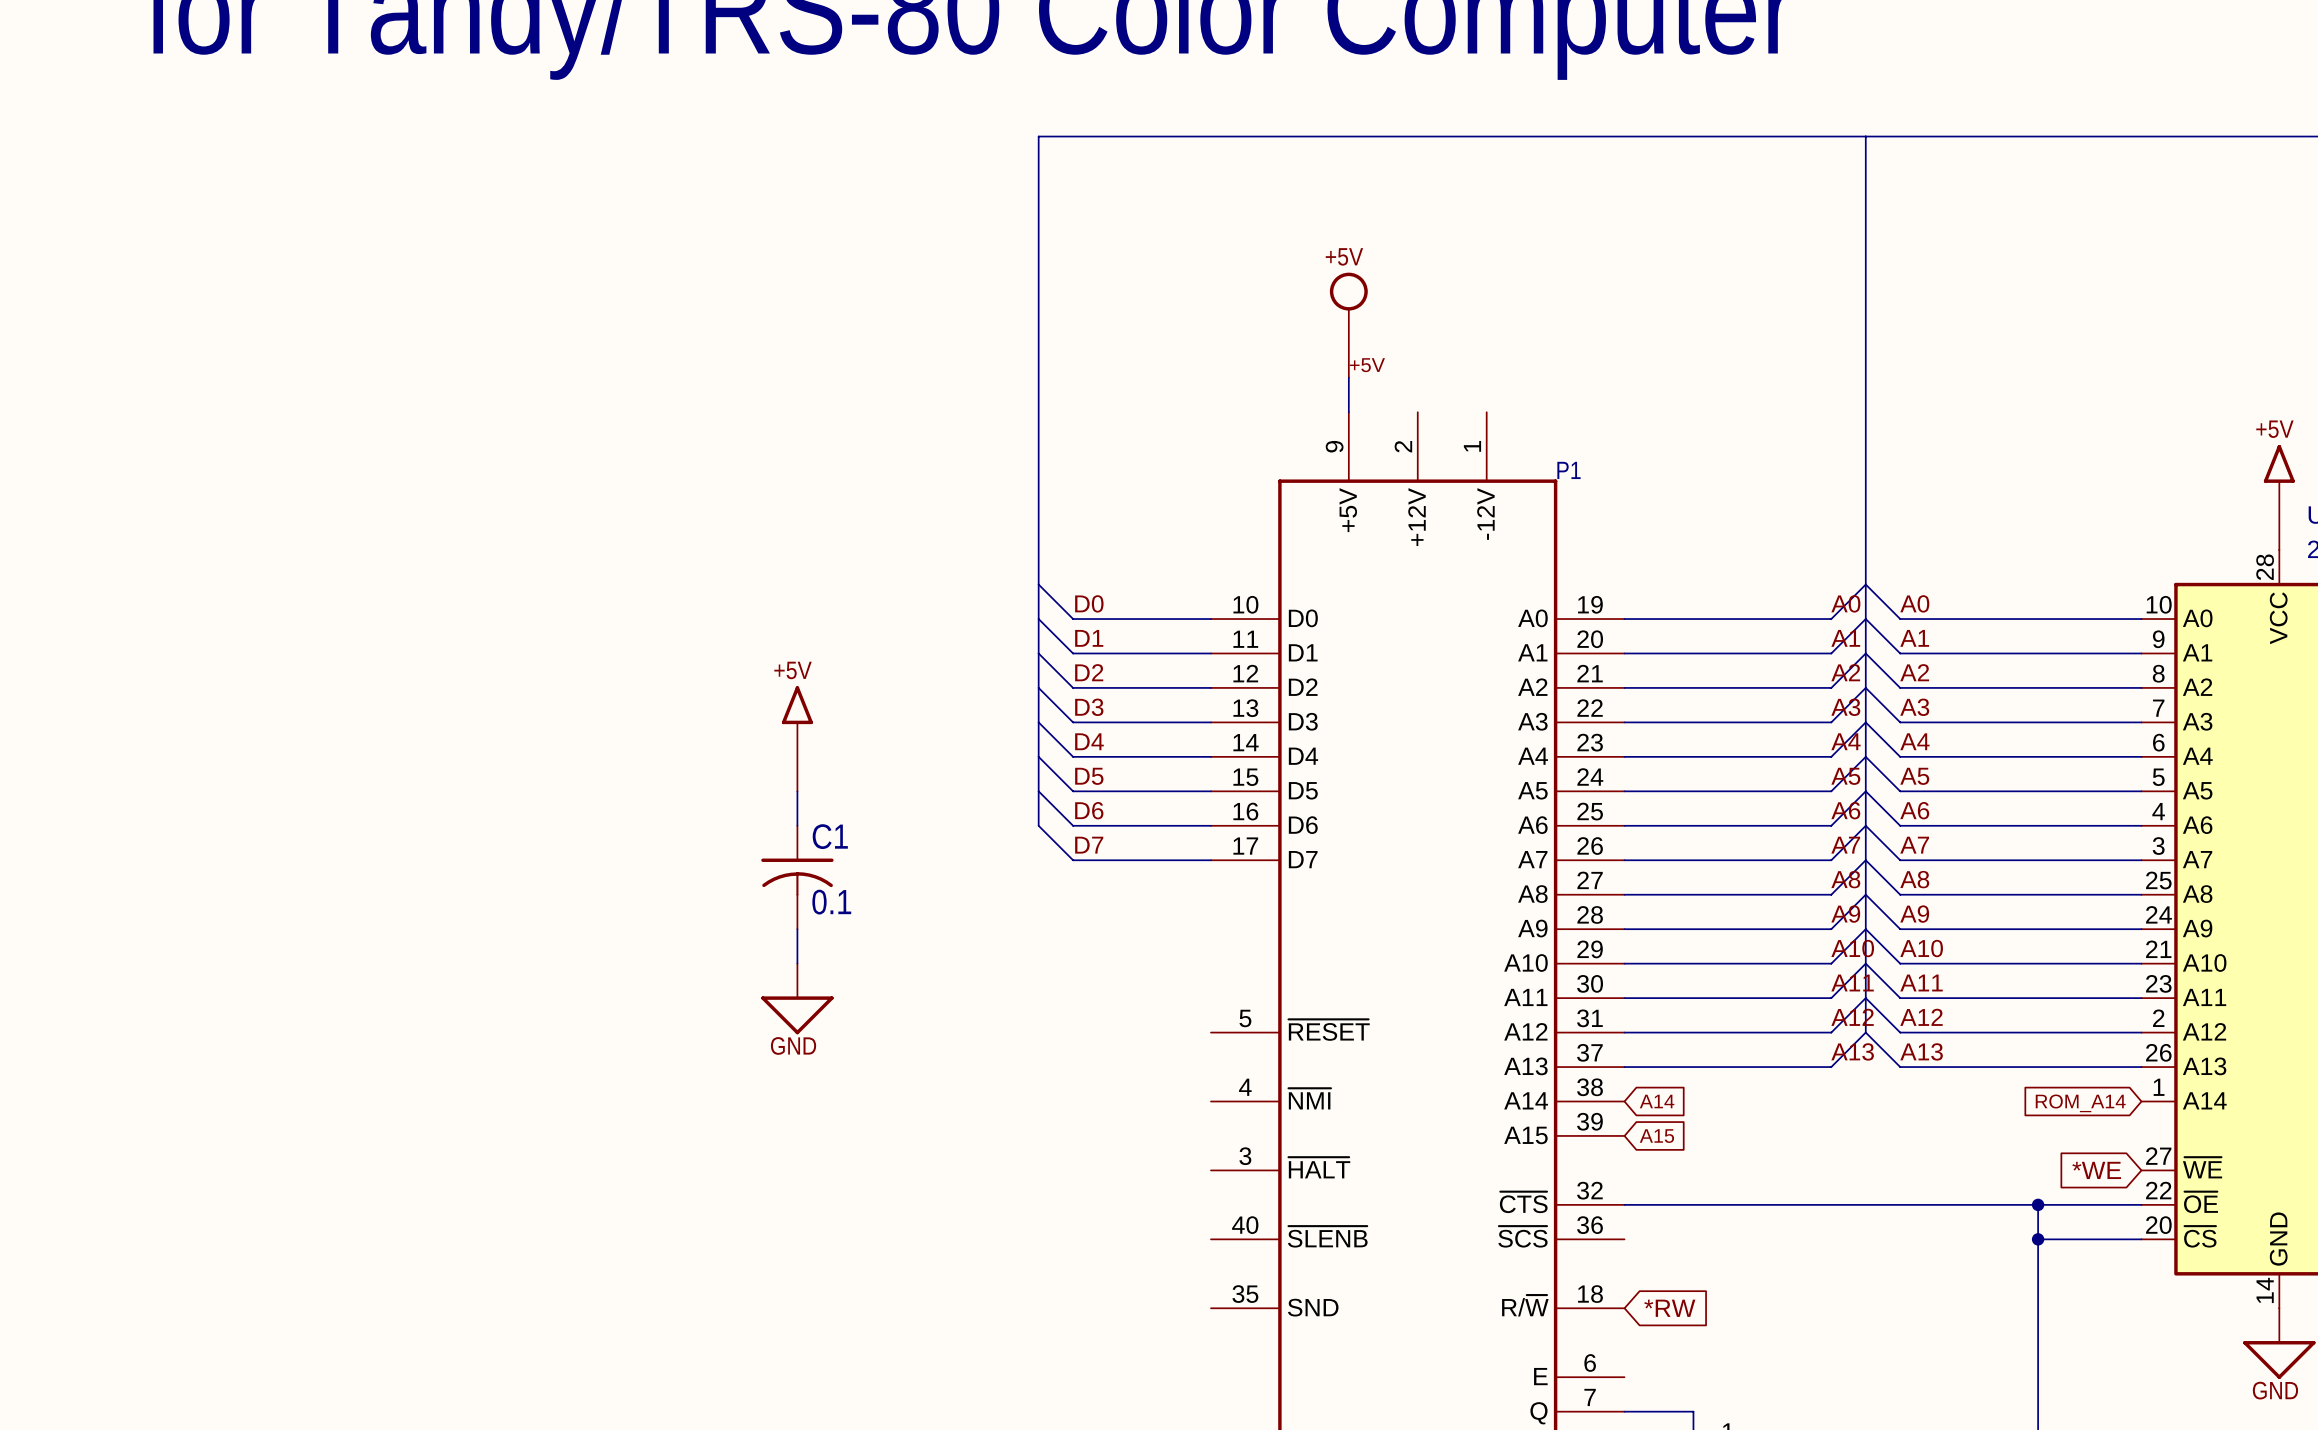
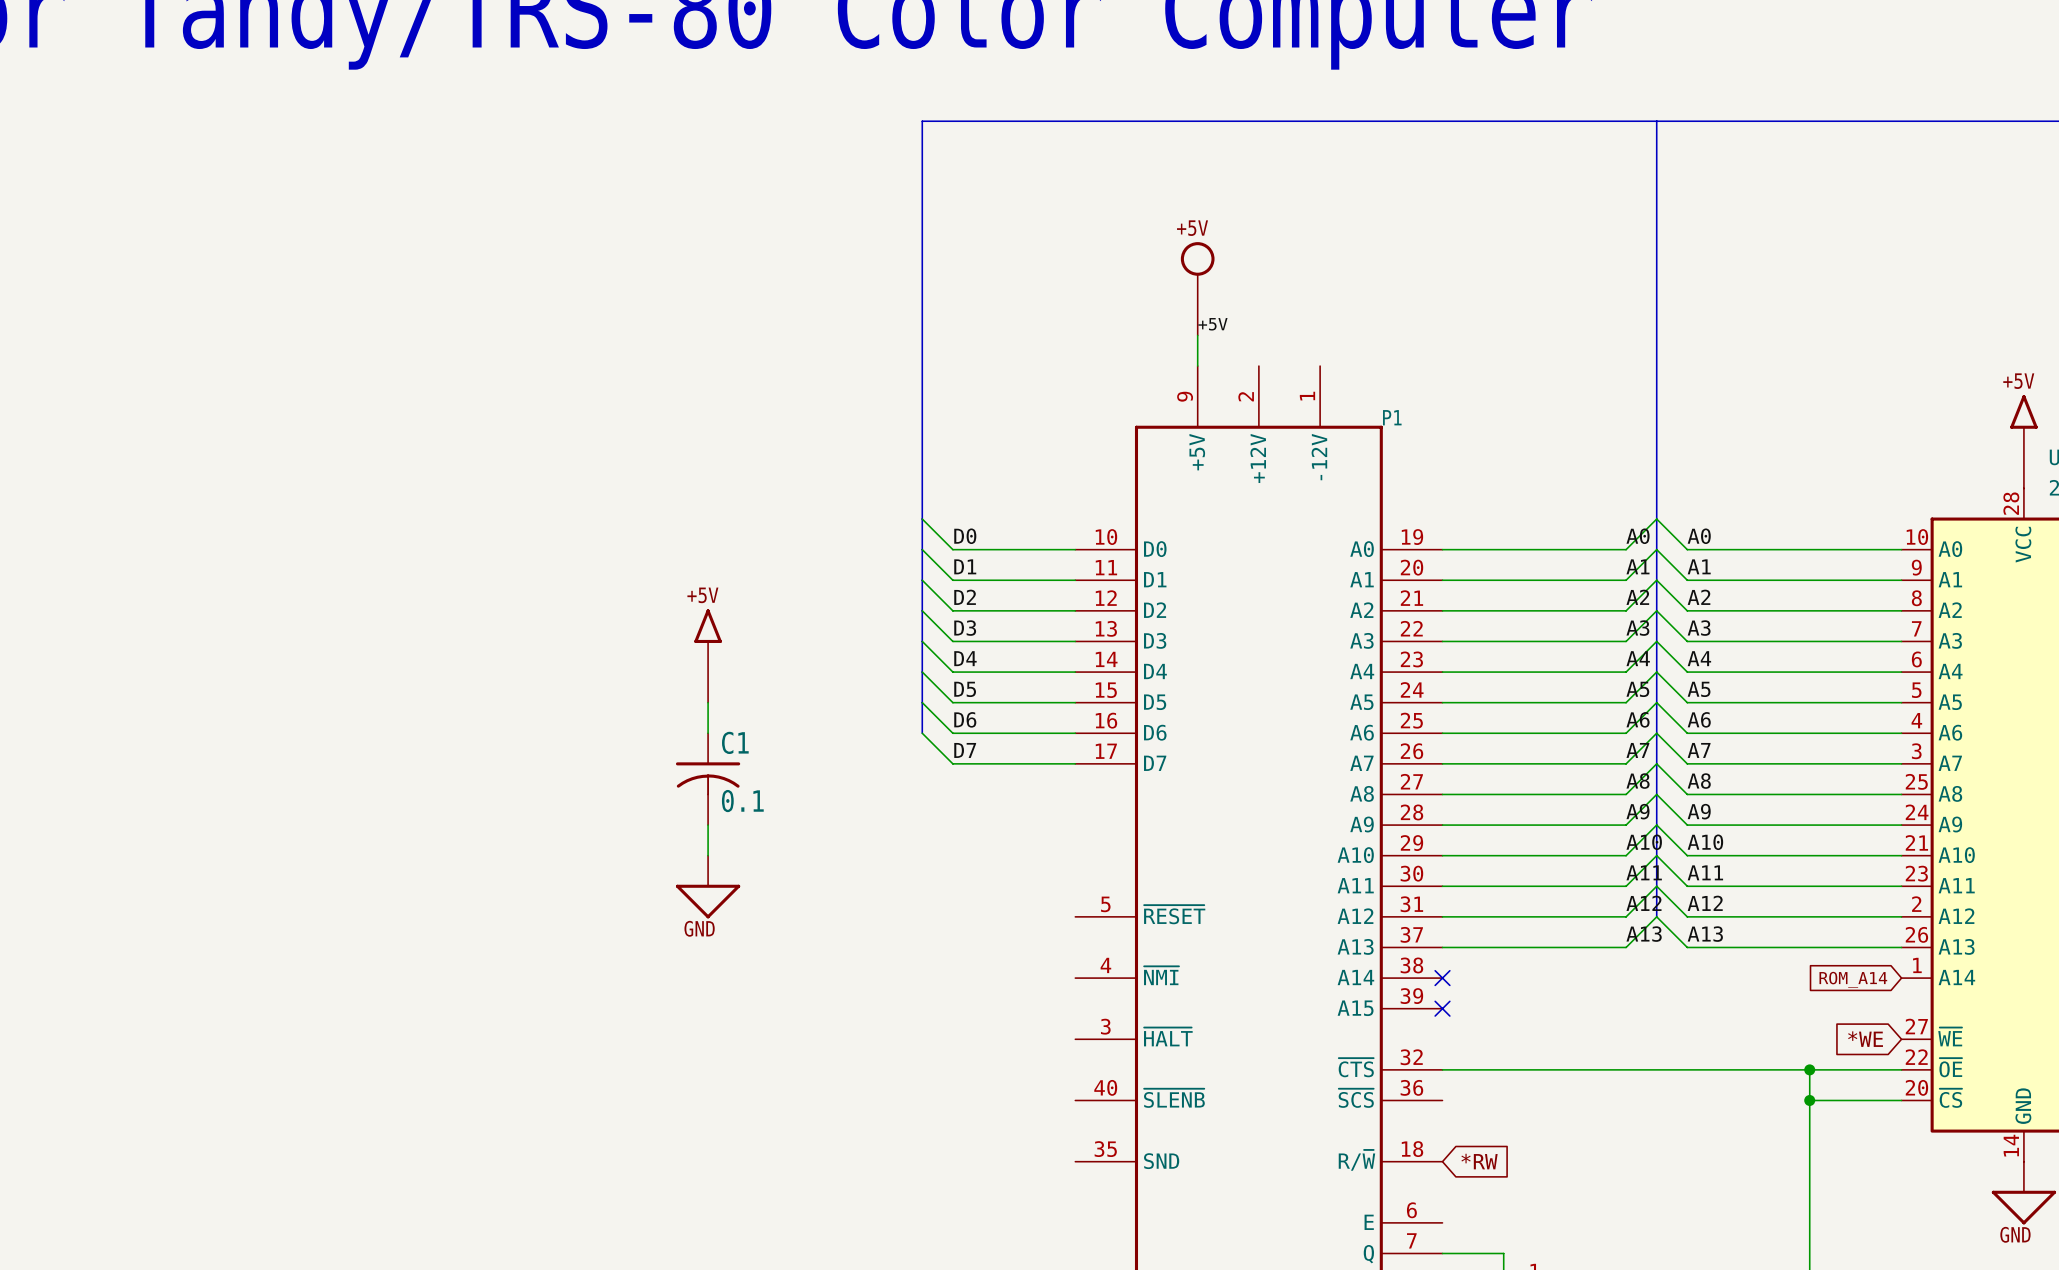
no-connect mark: none -> (1442, 978)
global label: A14 (1657, 1101) -> none
no-connect mark: none -> (1442, 1008)
global label: A15 (1656, 1136) -> none

